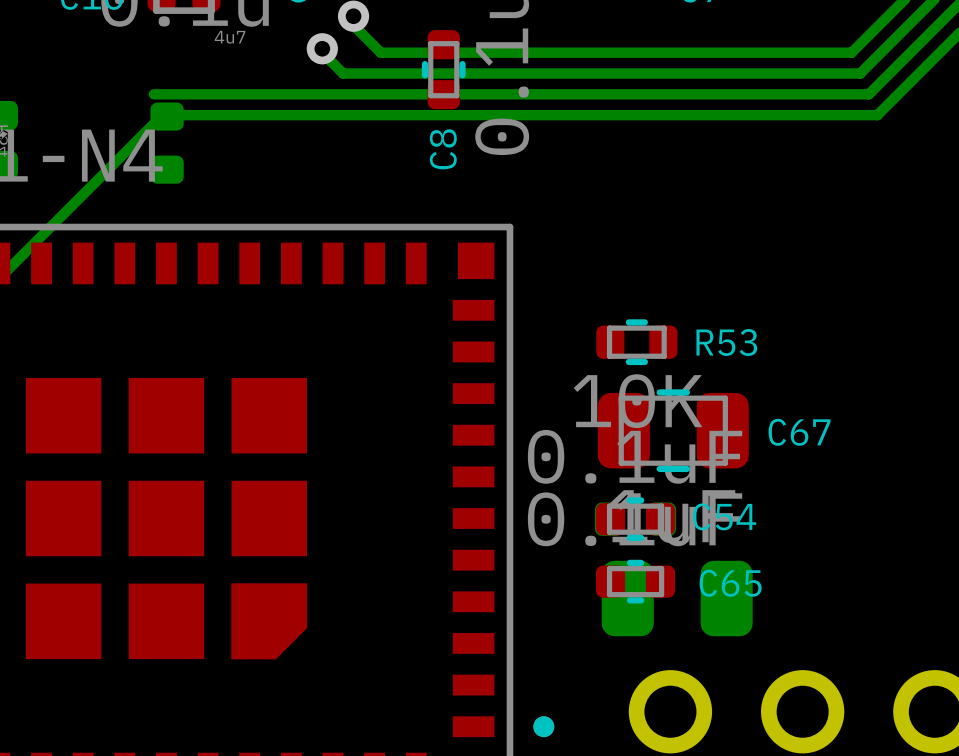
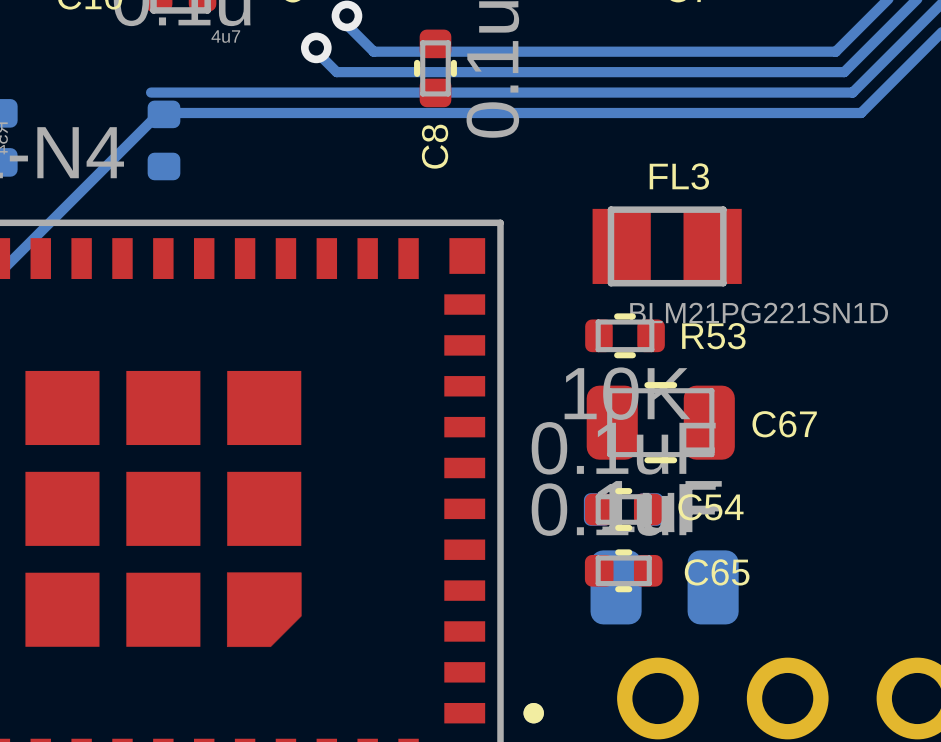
FL3: none -> BLM21PG221SN1D (667, 246)

